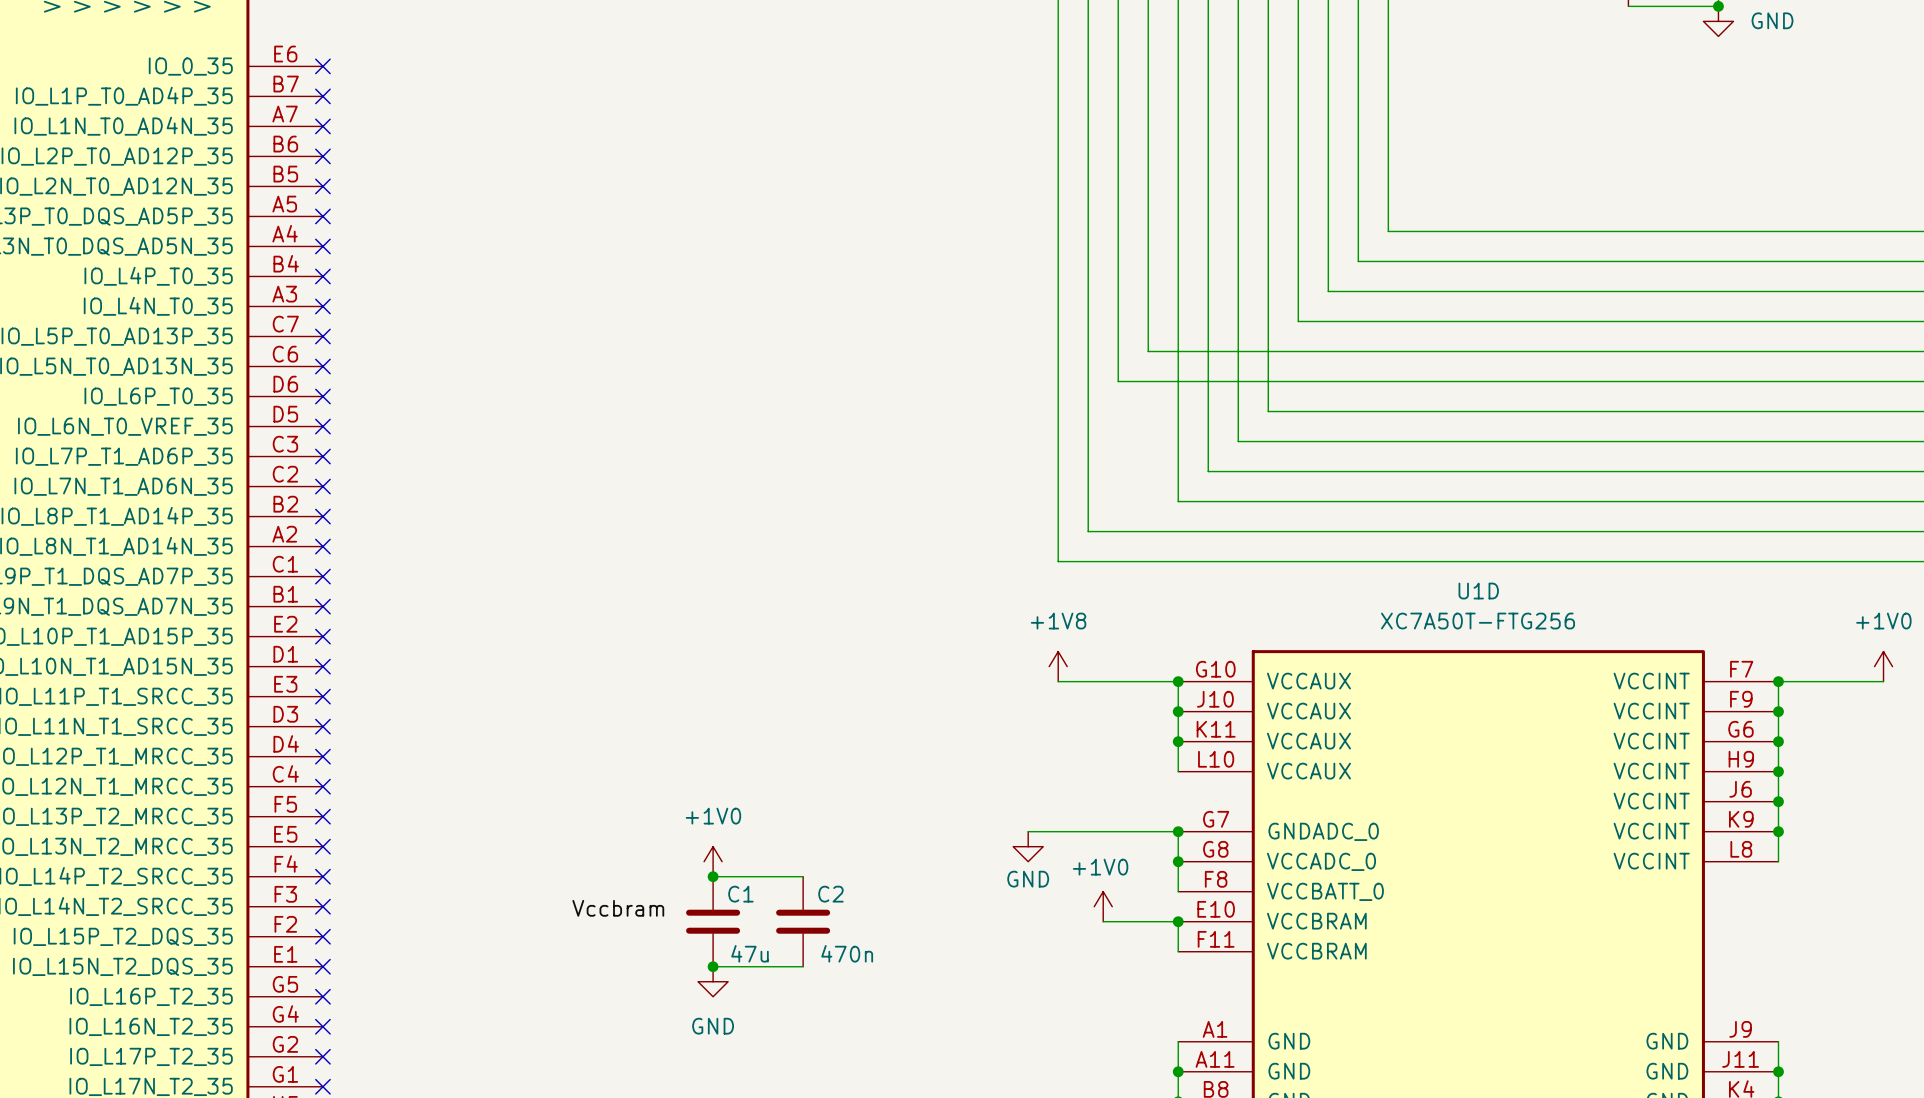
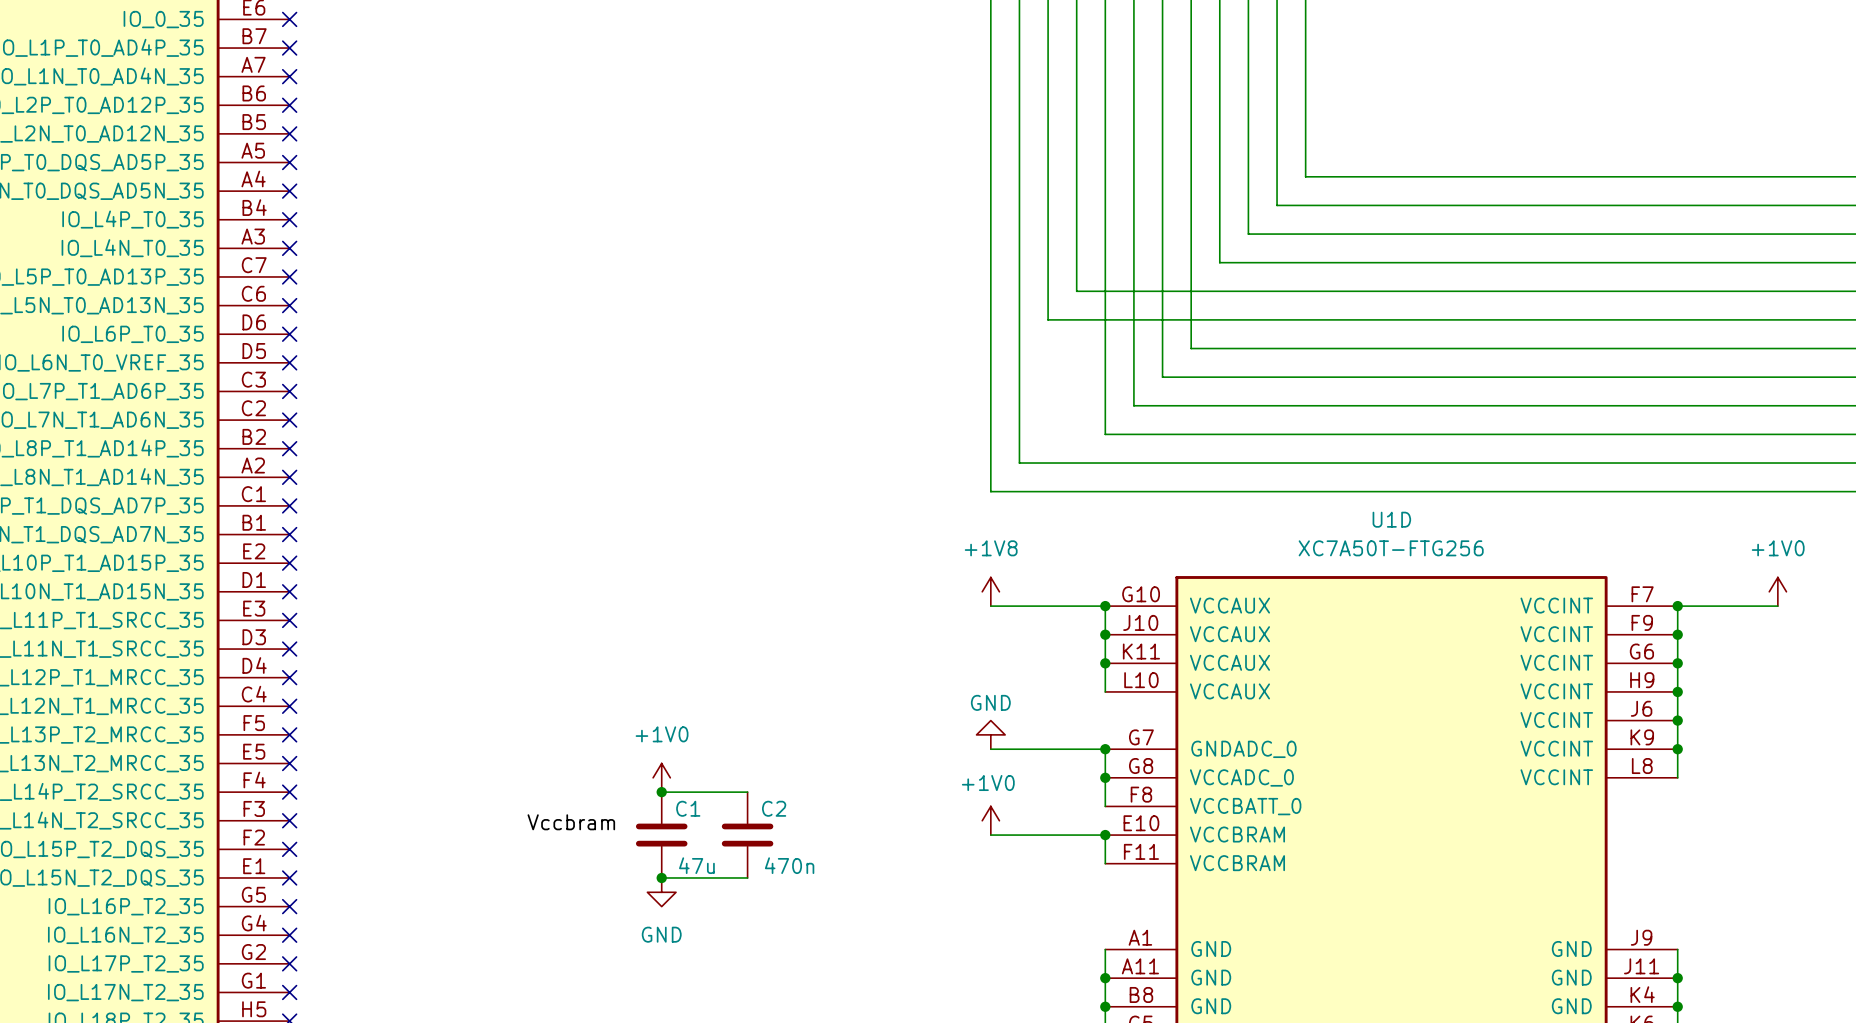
wire: (1028, 831) (1058, 831) -> none
power symbol rotation: 0° (1028, 846) -> 180° (990, 734)
power symbol position: GND (1028, 846) -> GND (990, 734)
power symbol position: +1V0 (1103, 906) -> +1V0 (990, 820)
wire: none -> (990, 835) (1033, 835)

